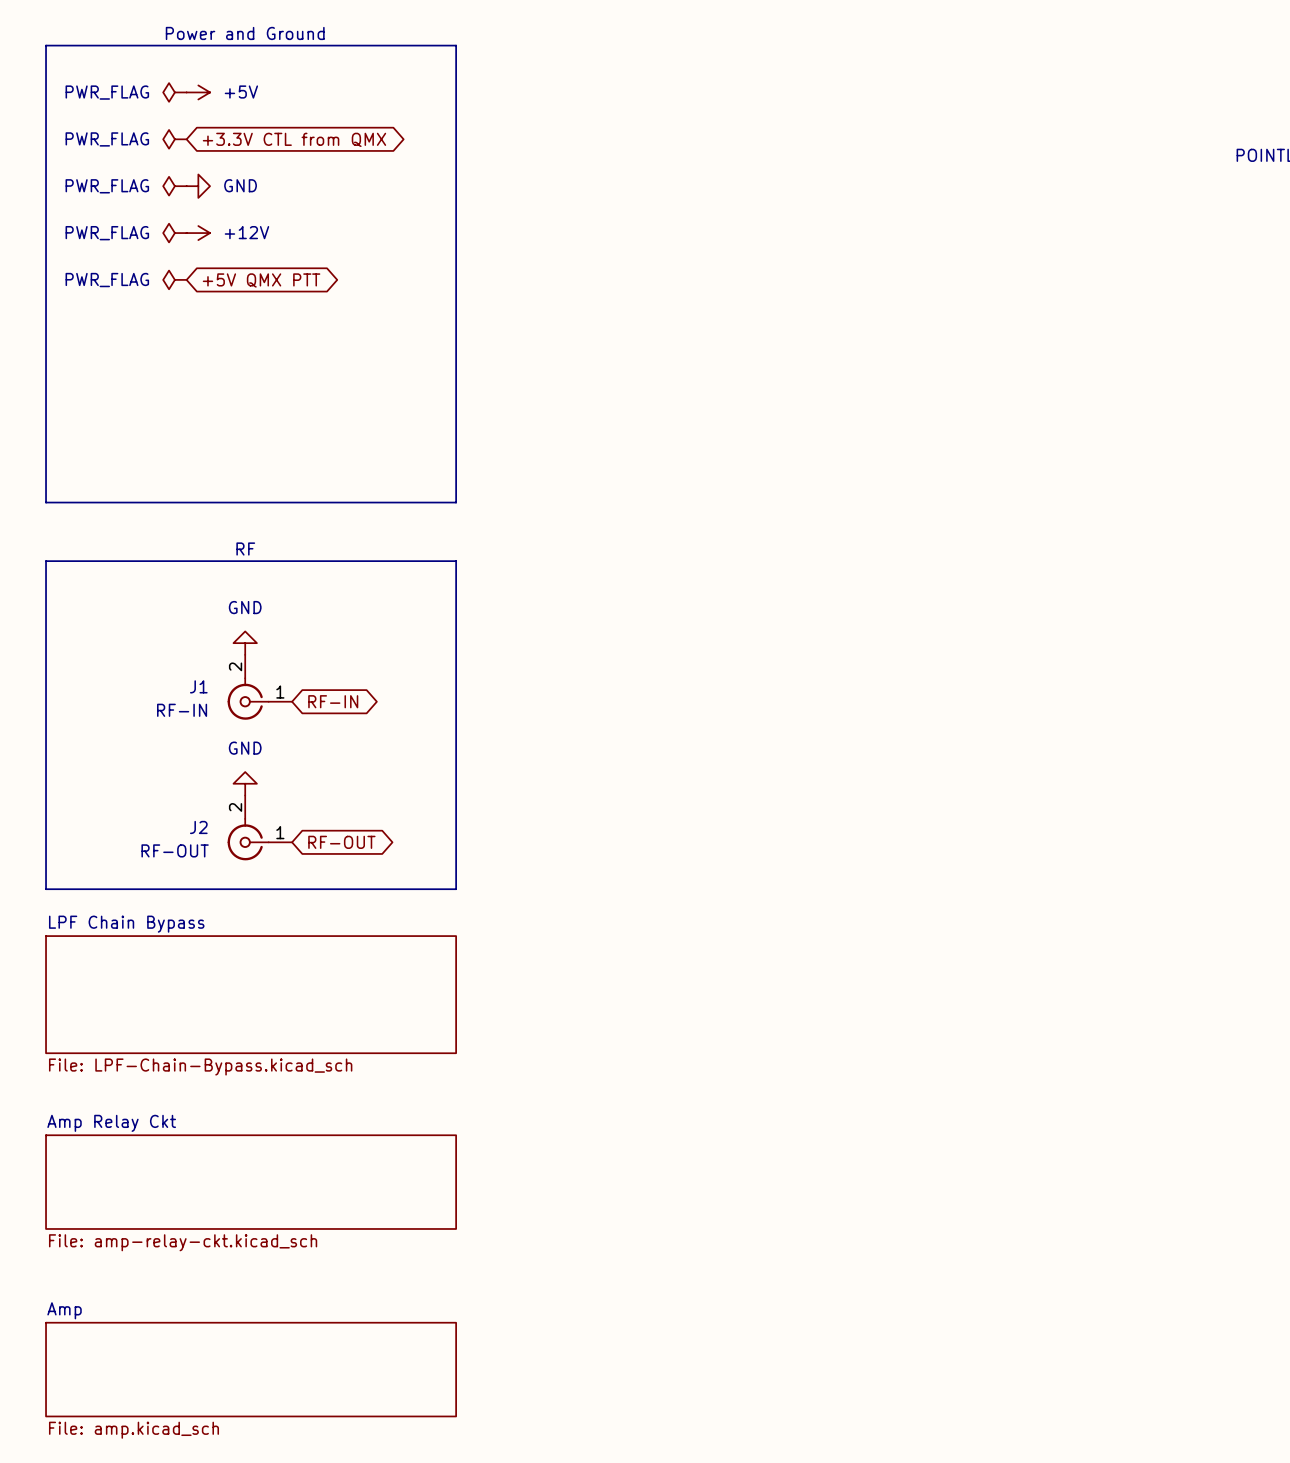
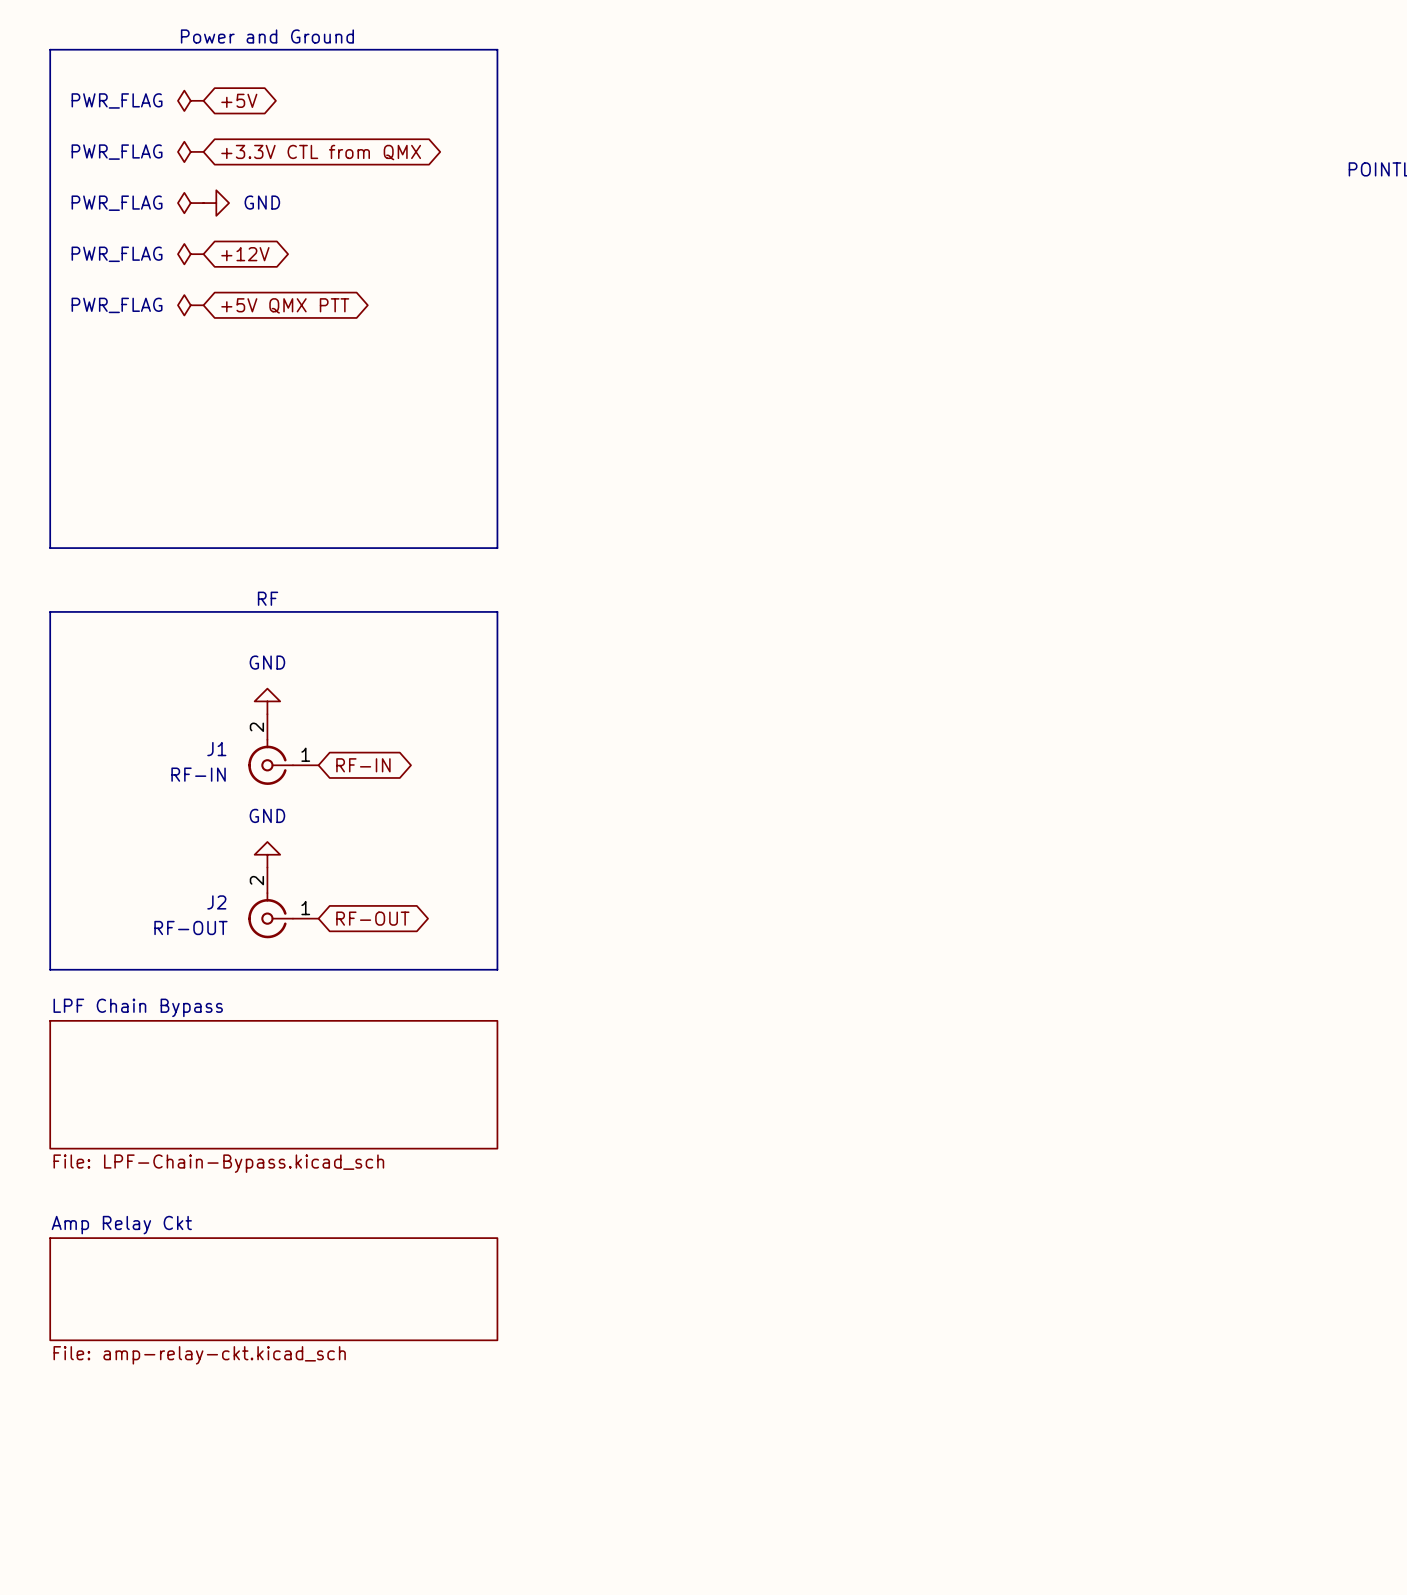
power symbol: +5V (198, 92) -> none
global label: none -> +5V (239, 100)
power symbol: +12V (198, 233) -> none
global label: none -> +12V (245, 254)
sheet Amp: File: amp.kicad_sch (251, 1369) -> none

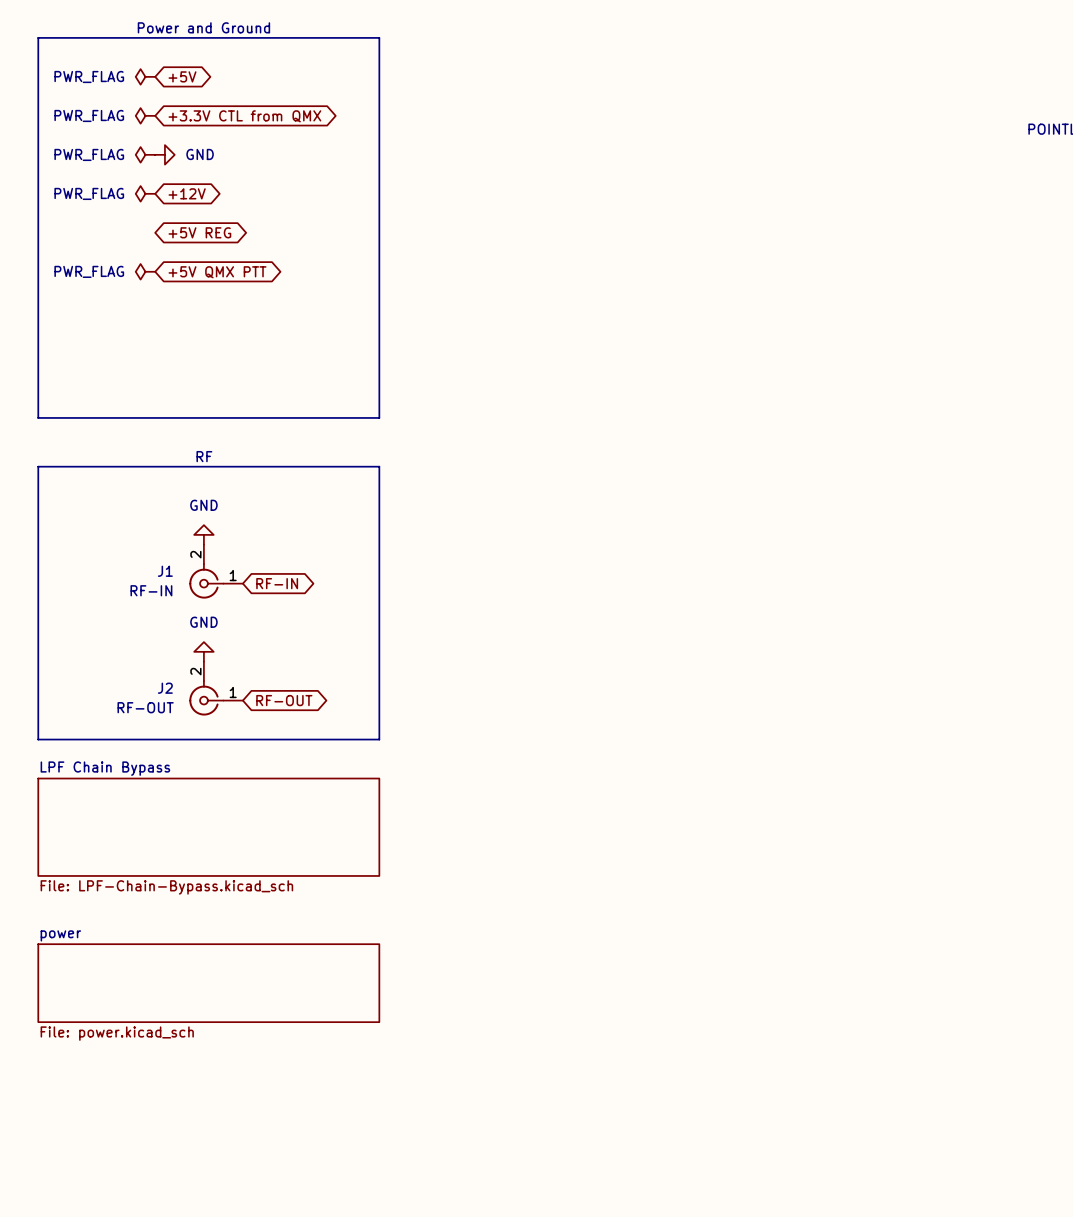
power symbol position: PWR_FLAG (190, 305) -> PWR_FLAG (145, 271)
global label: +5V QMX PTT (285, 305) -> +5V REG (199, 232)
global label: none -> +5V QMX PTT (217, 272)
sheet Amp Relay Ckt name: Amp Relay Ckt (121, 1225) -> power (60, 935)
sheet Amp Relay Ckt value: File: amp-relay-ckt.kicad_sch (199, 1355) -> File: power.kicad_sch (117, 1033)

